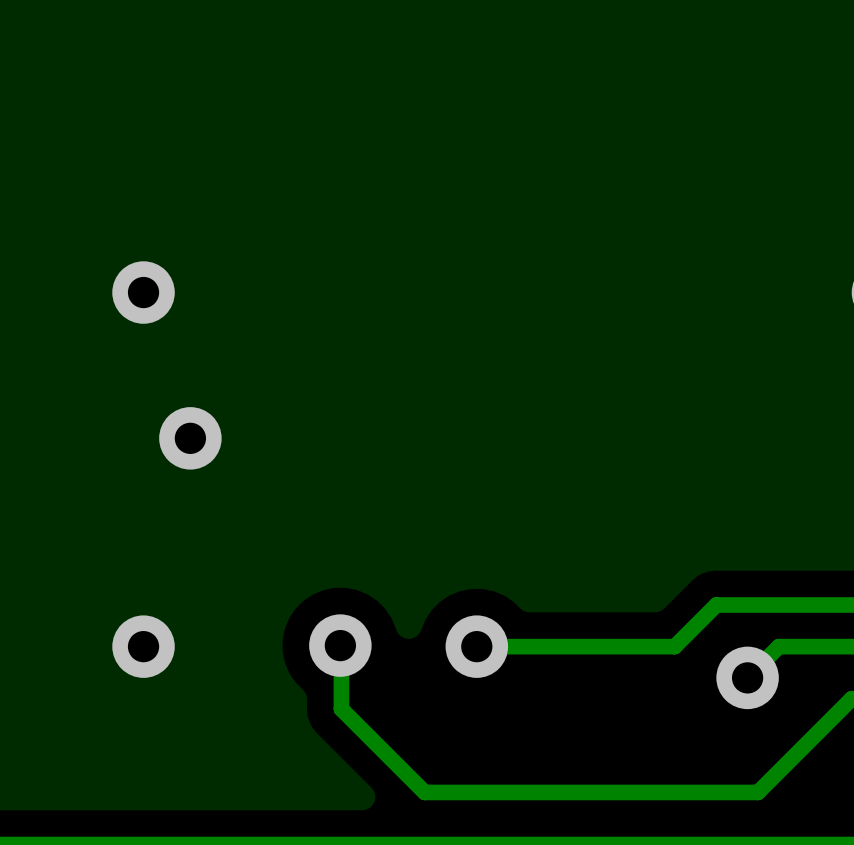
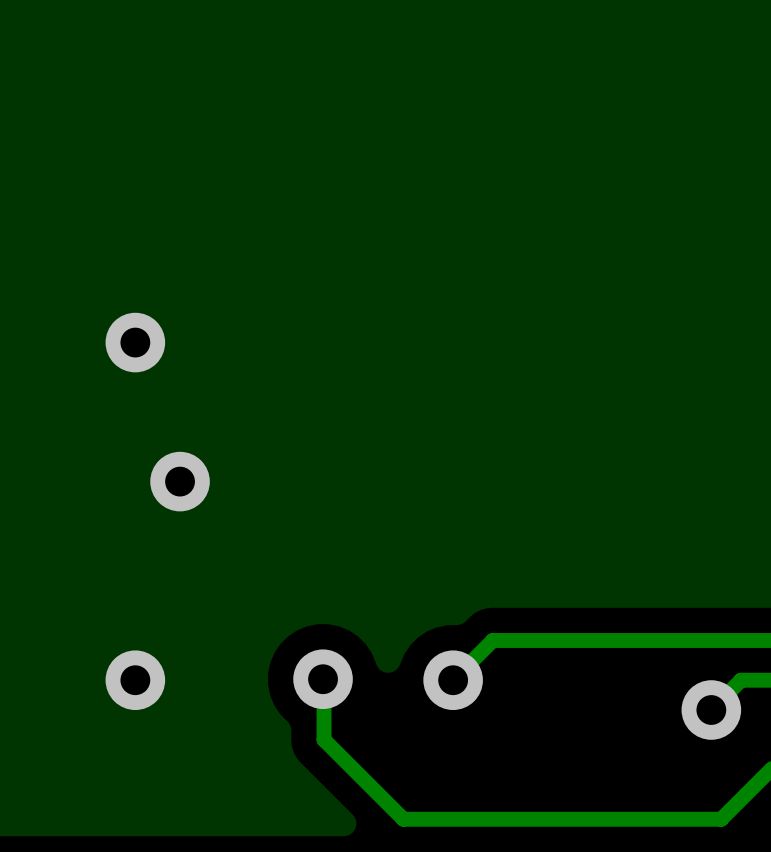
track: (716, 604) (674, 646) (476, 646) -> (681, 640) (492, 640) (453, 680)

